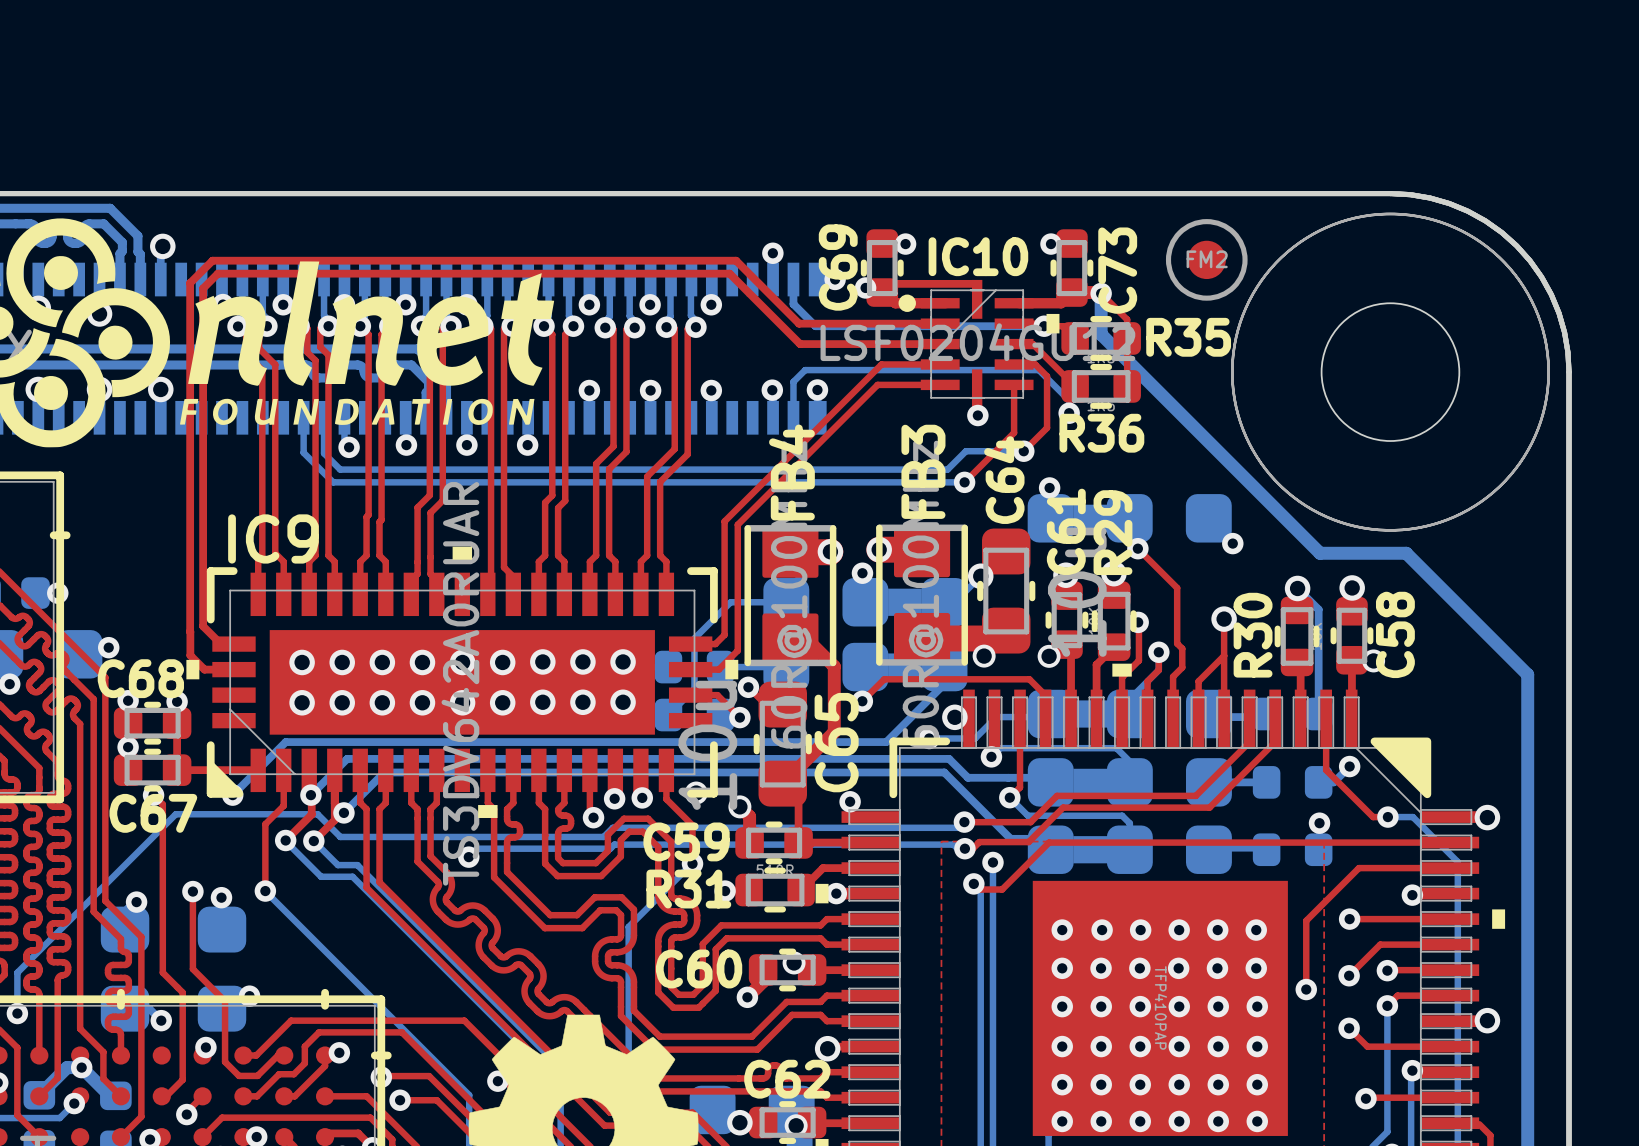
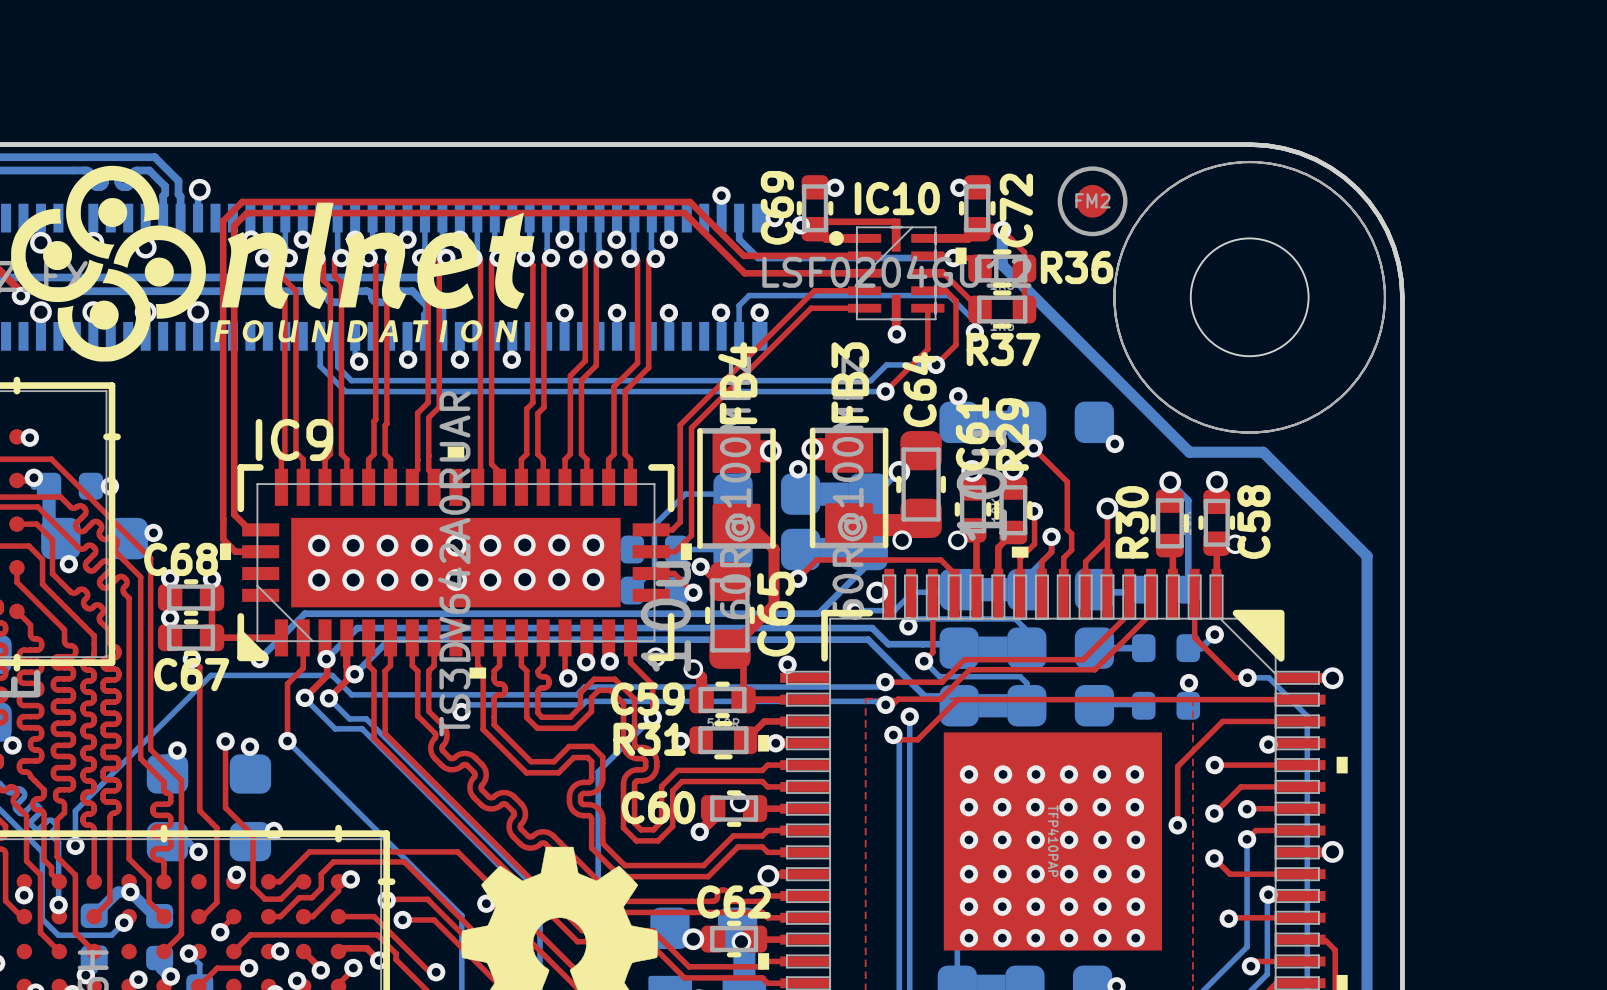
C73 name: C73 (1117, 270) -> C72 (1016, 210)
R35 name: R35 (1188, 337) -> R36 (1077, 267)
R36 name: R36 (1101, 433) -> R37 (1003, 349)

